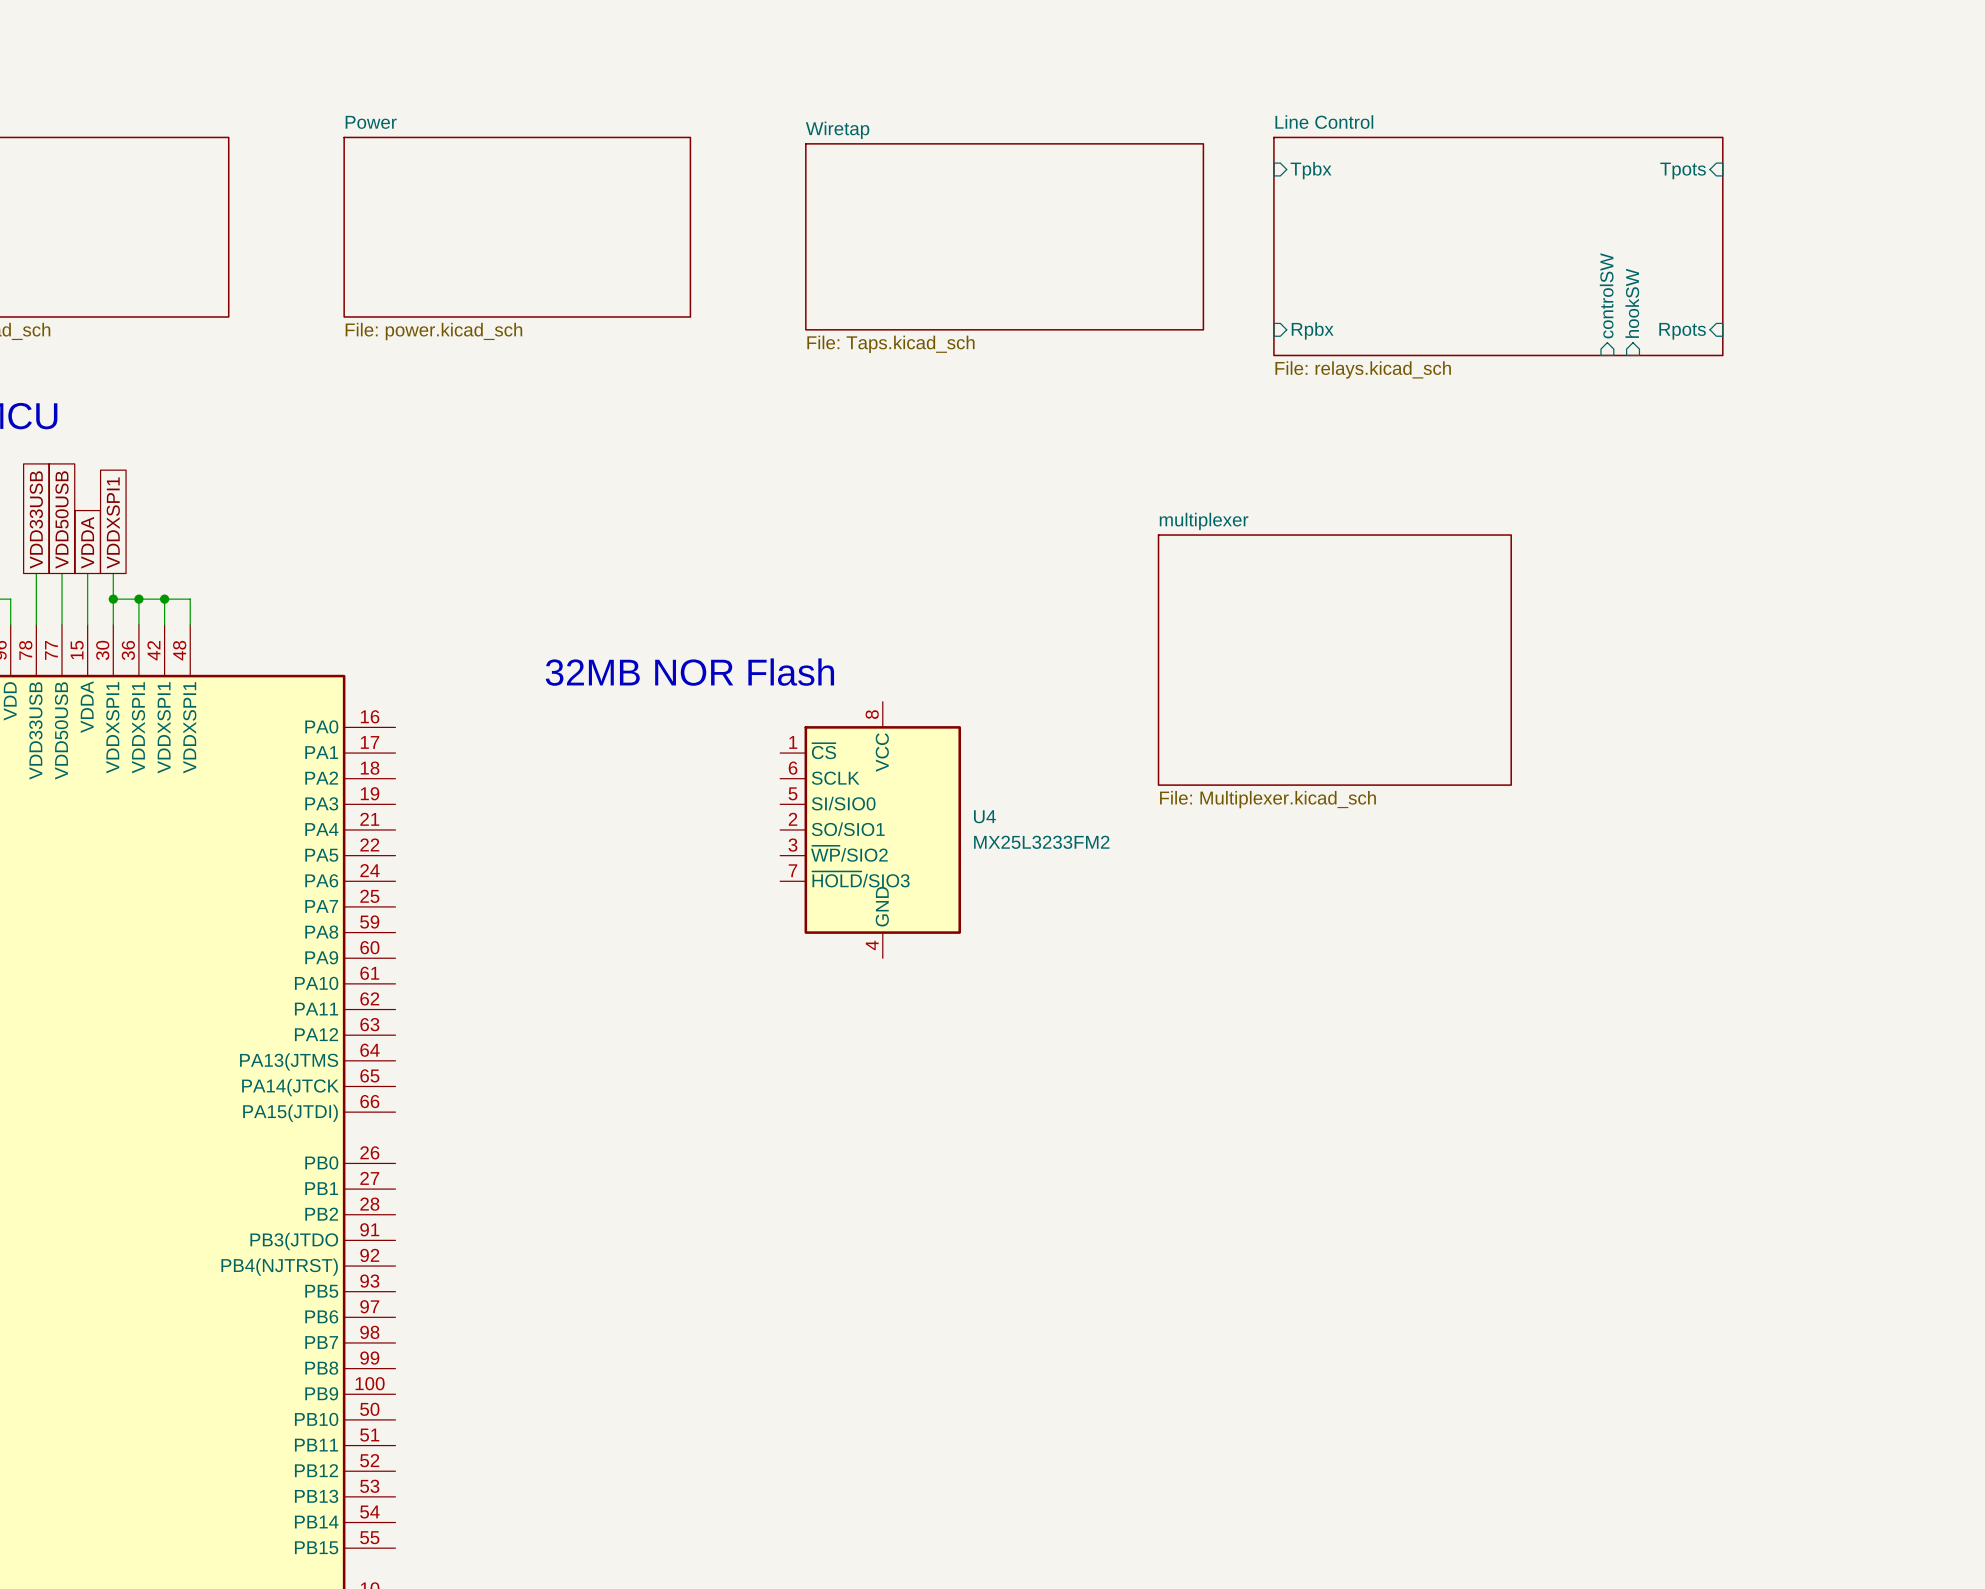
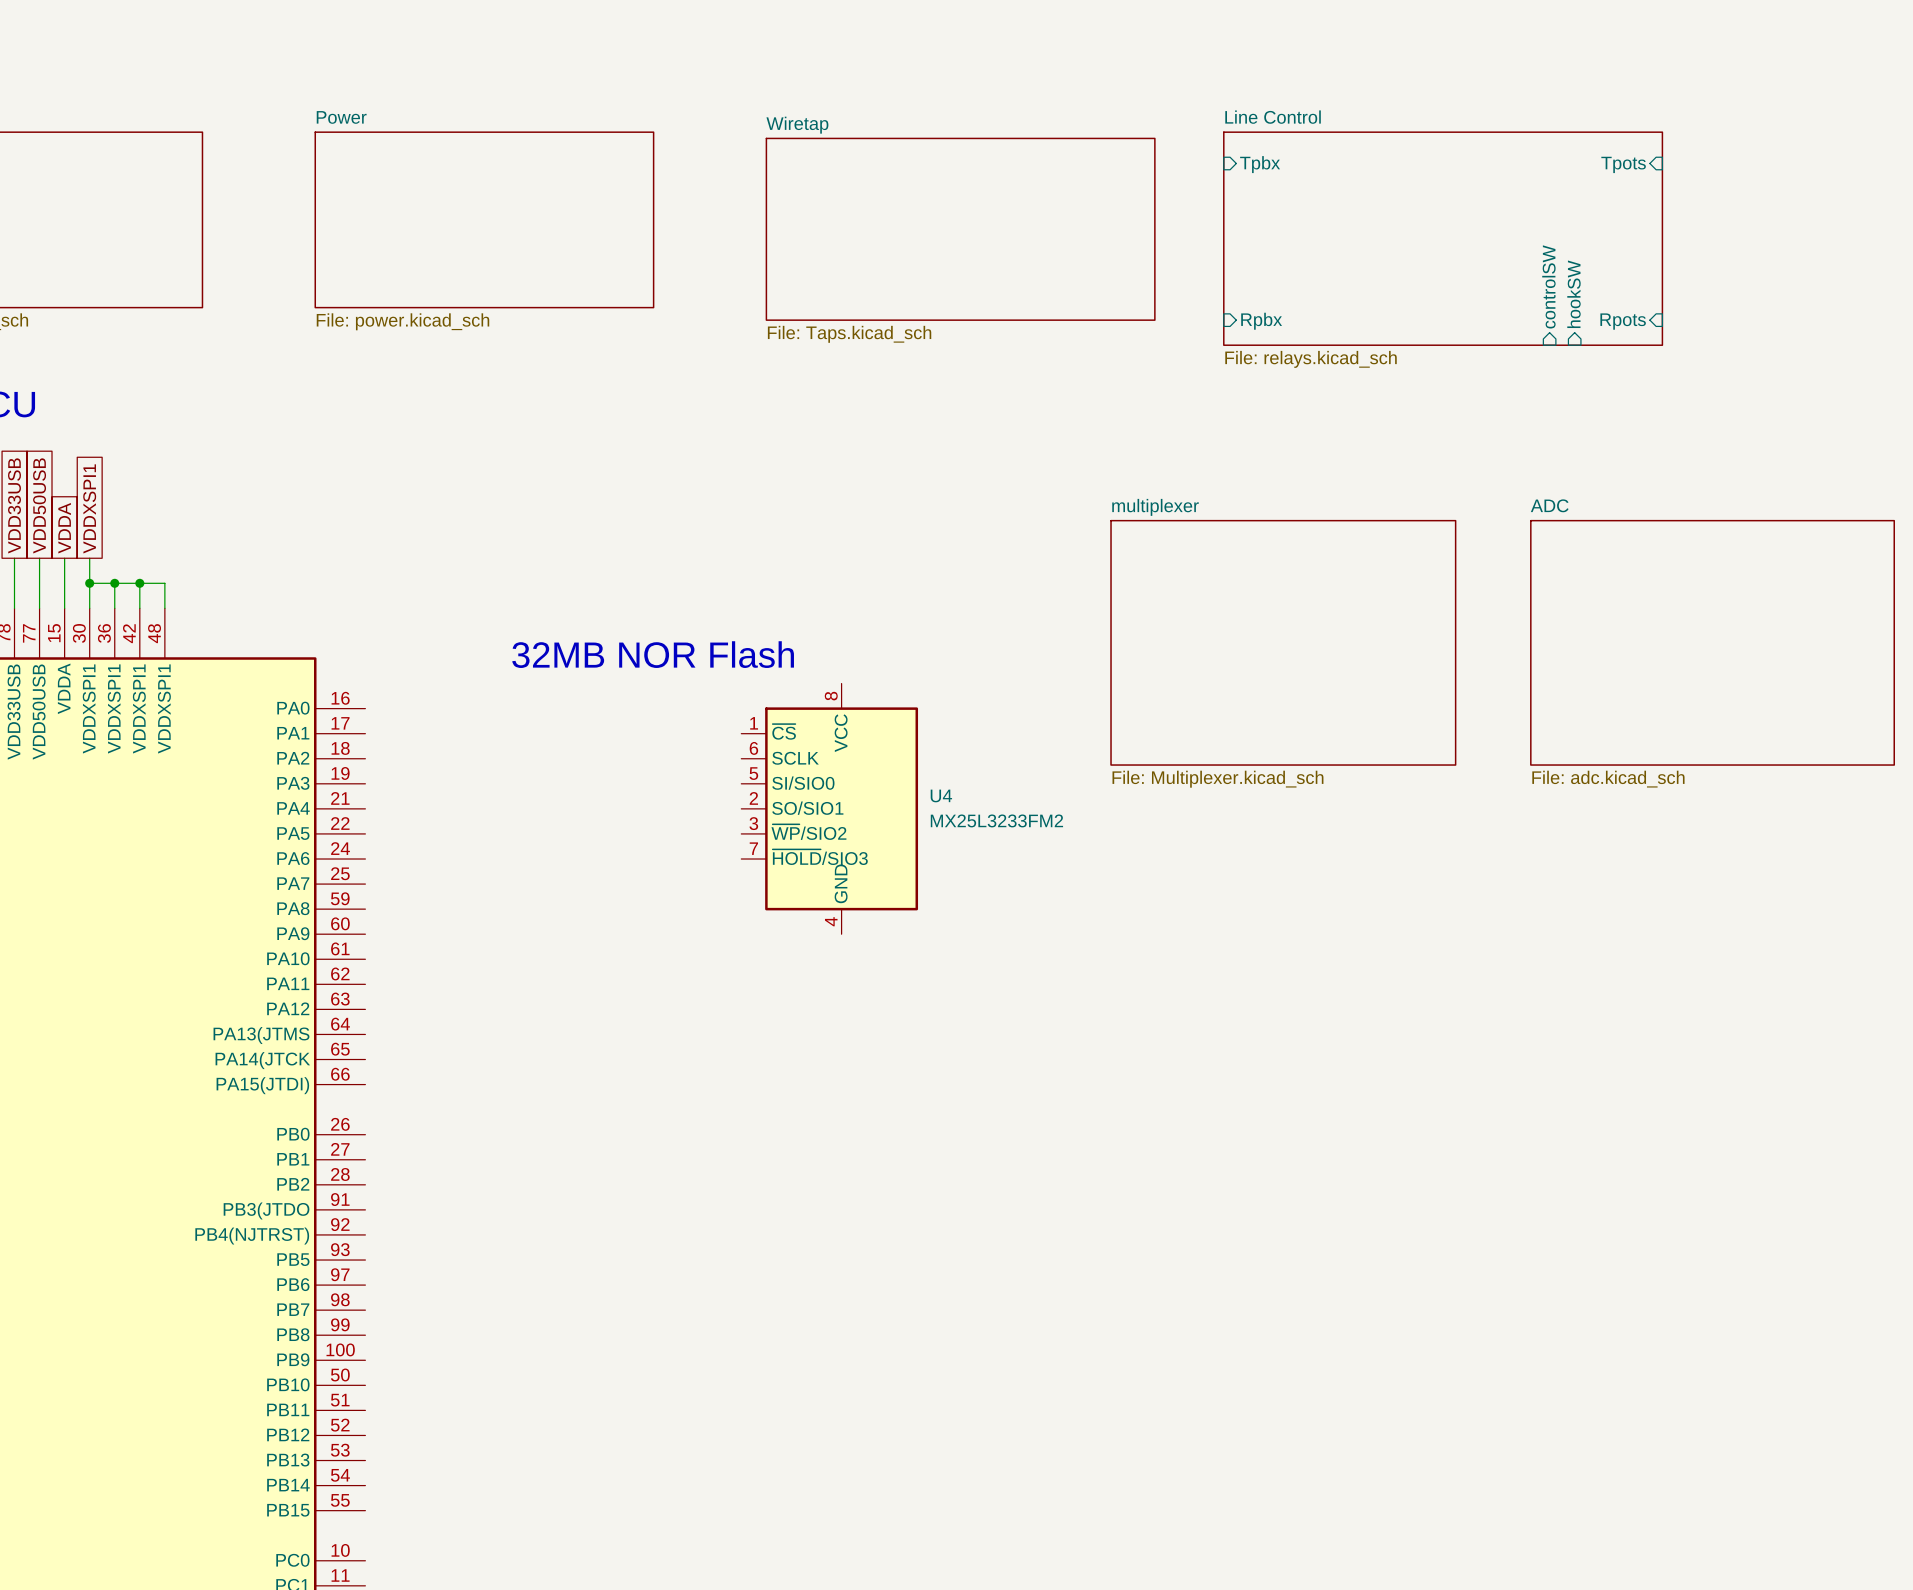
sheet ADC: none -> File: adc.kicad_sch (1712, 642)

